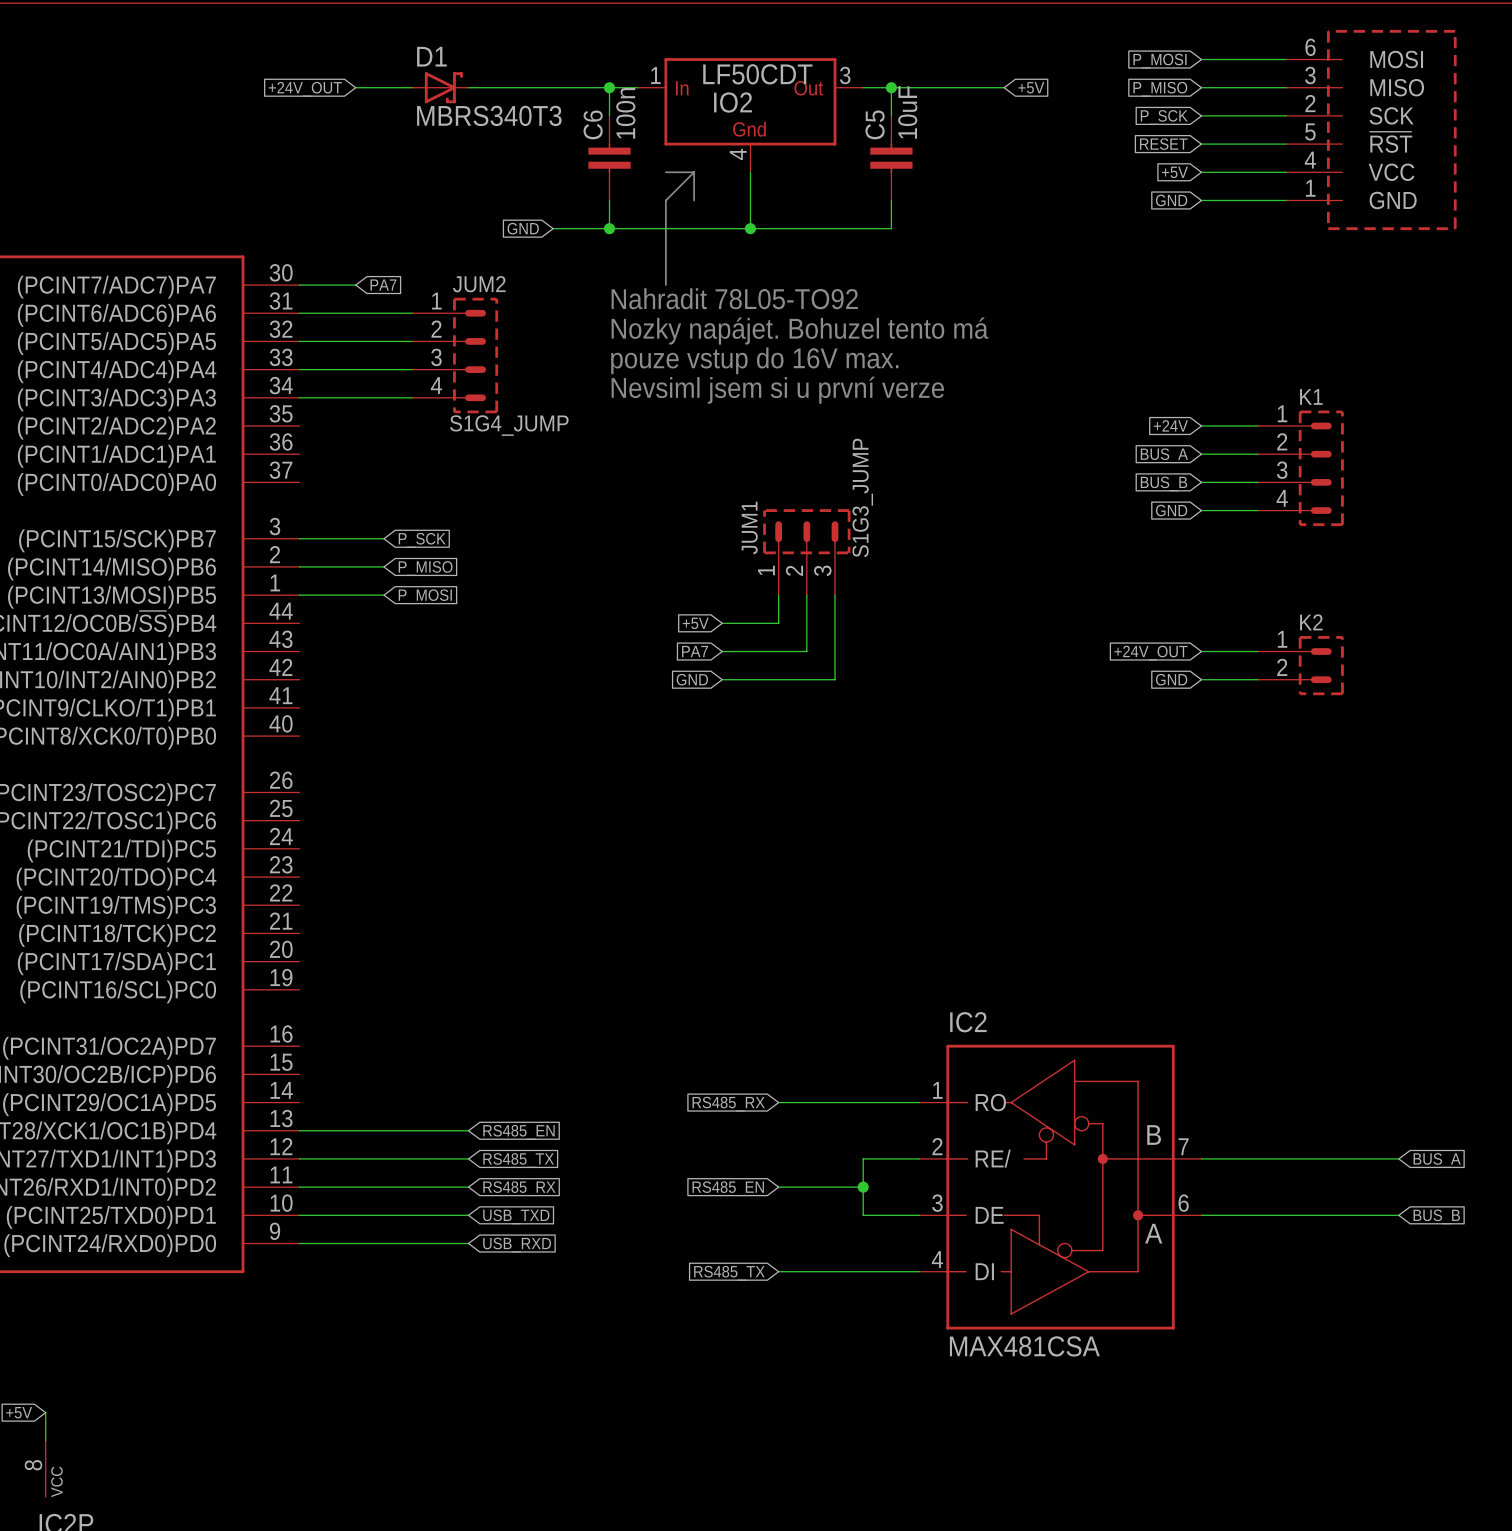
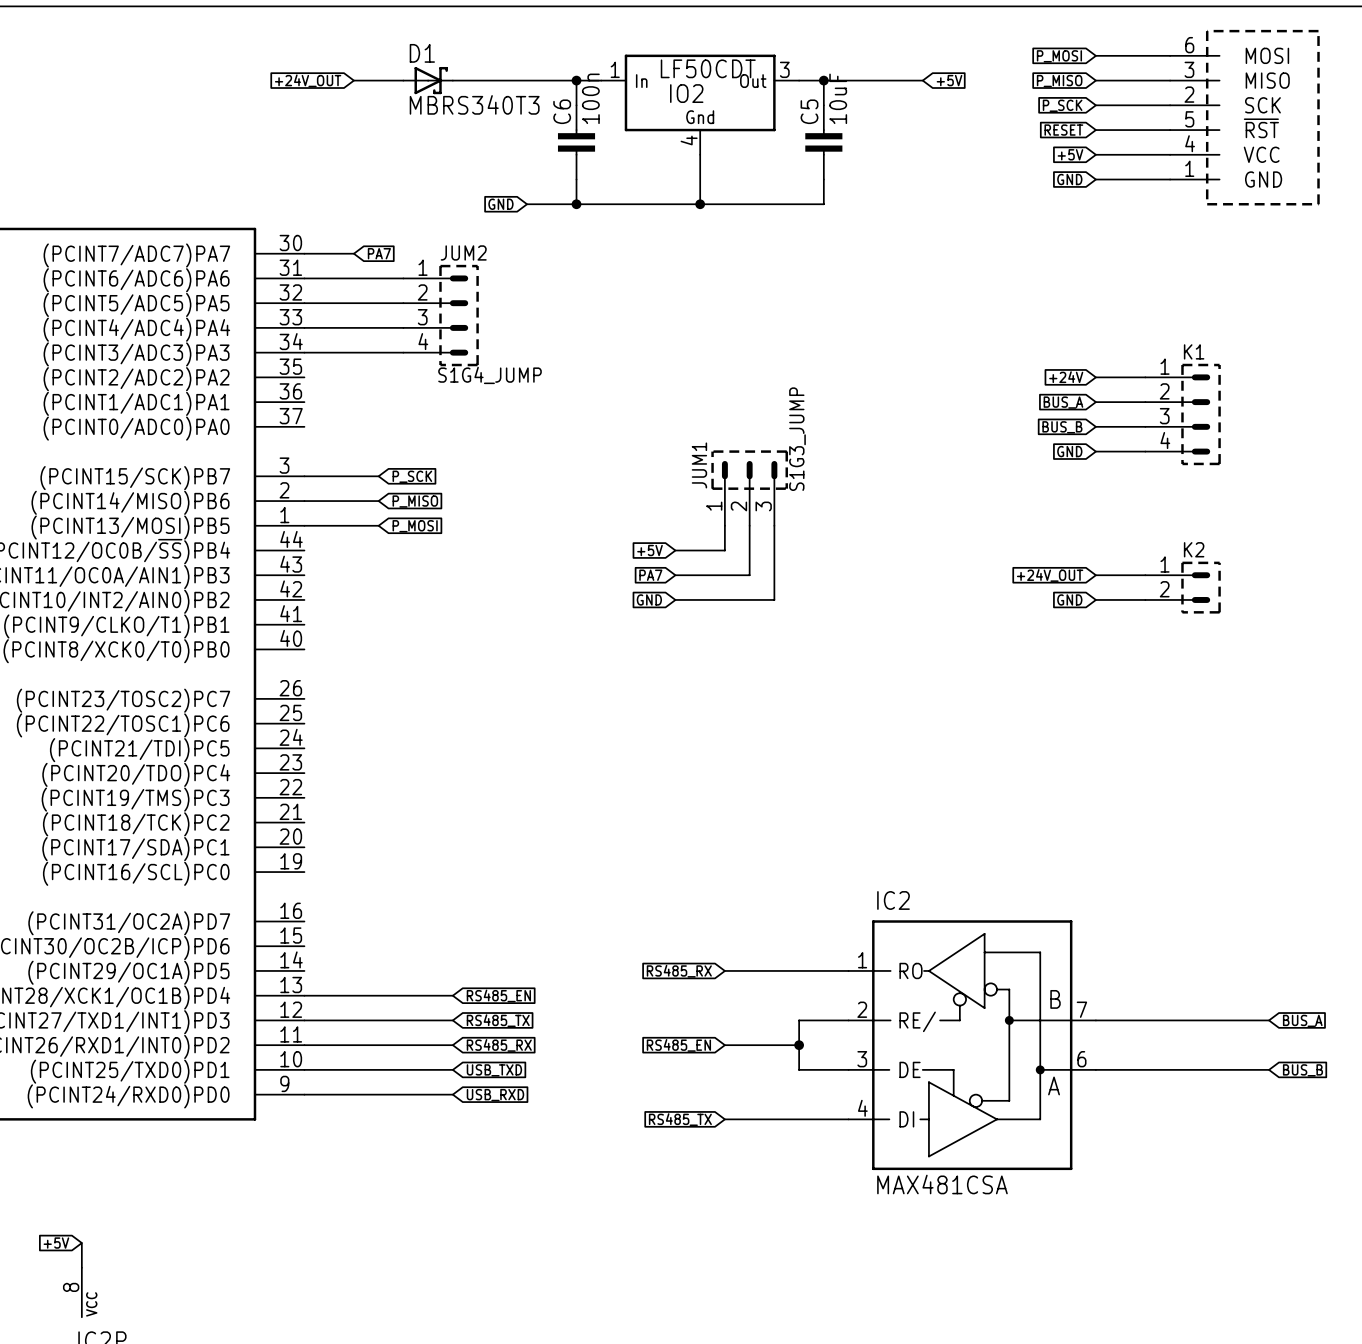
line: (665, 172) (694, 172) -> none
line: (694, 172) (665, 200) (665, 285) -> none
line: (694, 172) (694, 200) -> none
text: Nahradit 78L05-TO92 (734, 298) -> none
text: Nozky napájet. Bohuzel tento má (799, 331) -> none
text: pouze vstup do 16V max. (754, 360) -> none
text: Nevsiml jsem si u první verze (777, 390) -> none

